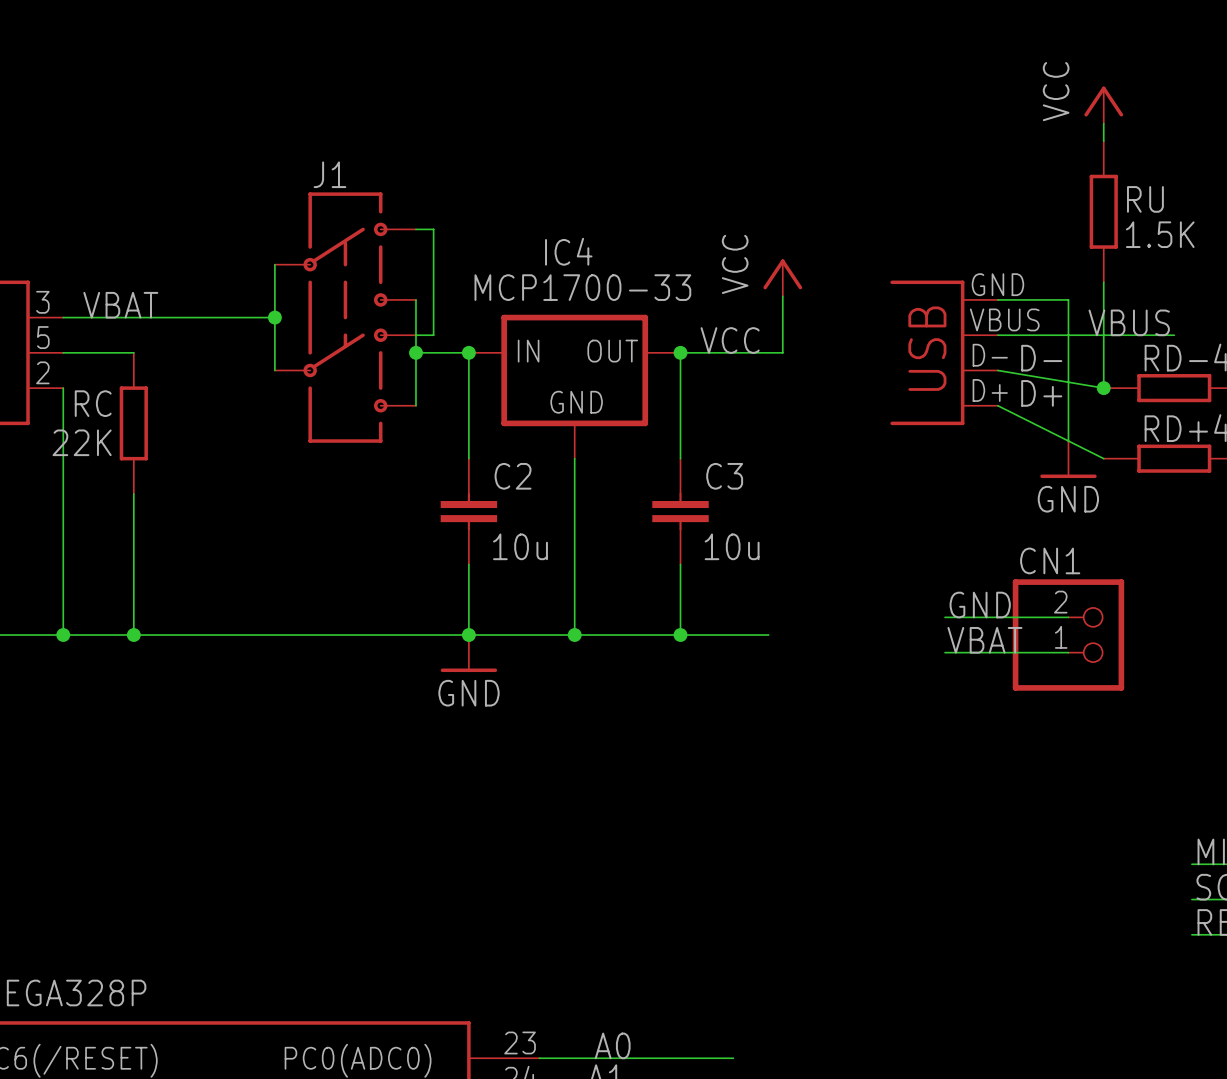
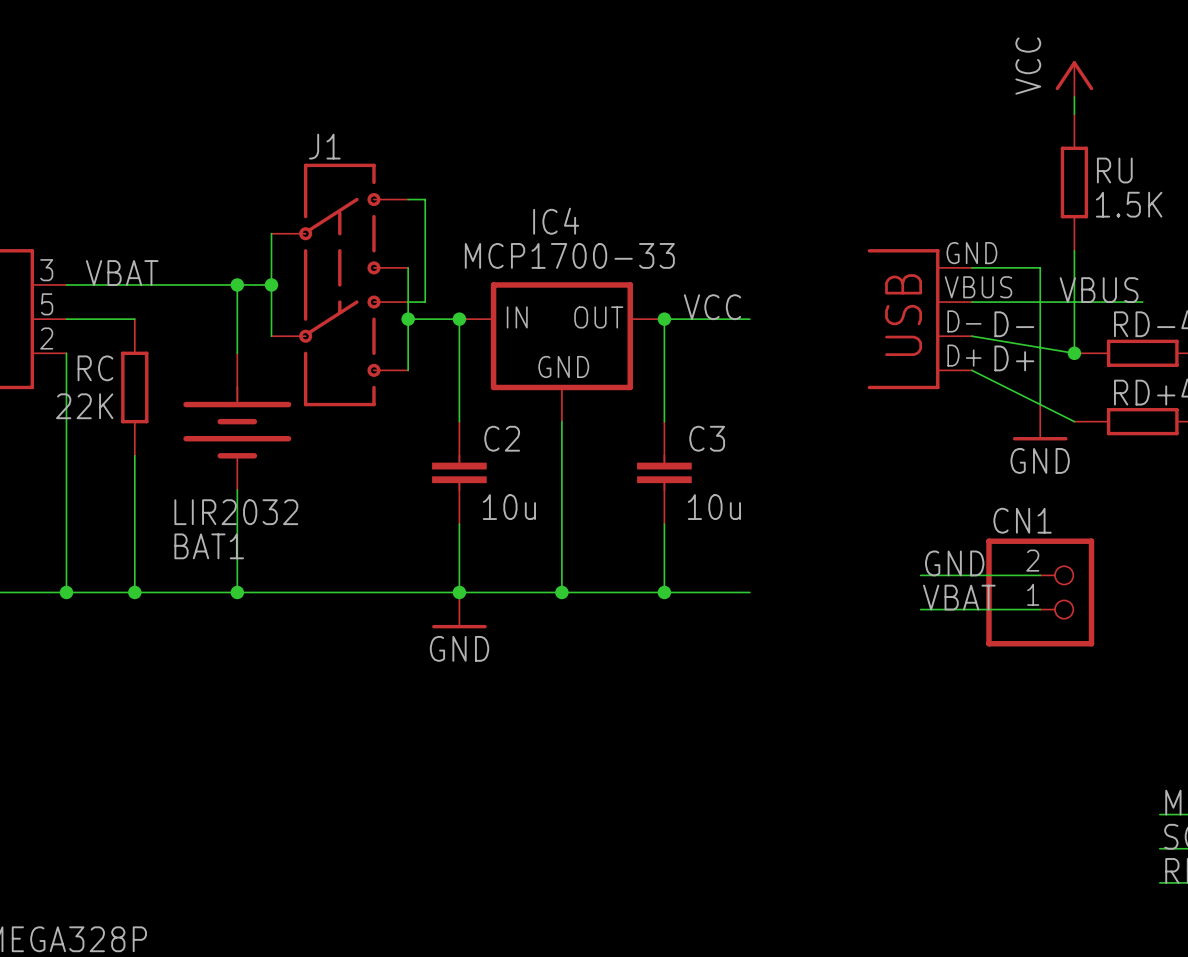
power symbol: VCC (782, 277) -> none
wire: (782, 296) (782, 352) (768, 352) -> none
wire: none -> (237, 284) (237, 353)
junction: none -> (237, 284)
BAT1: none -> LIR2032 (237, 421)
wire: none -> (237, 489) (237, 592)
junction: none -> (237, 592)

